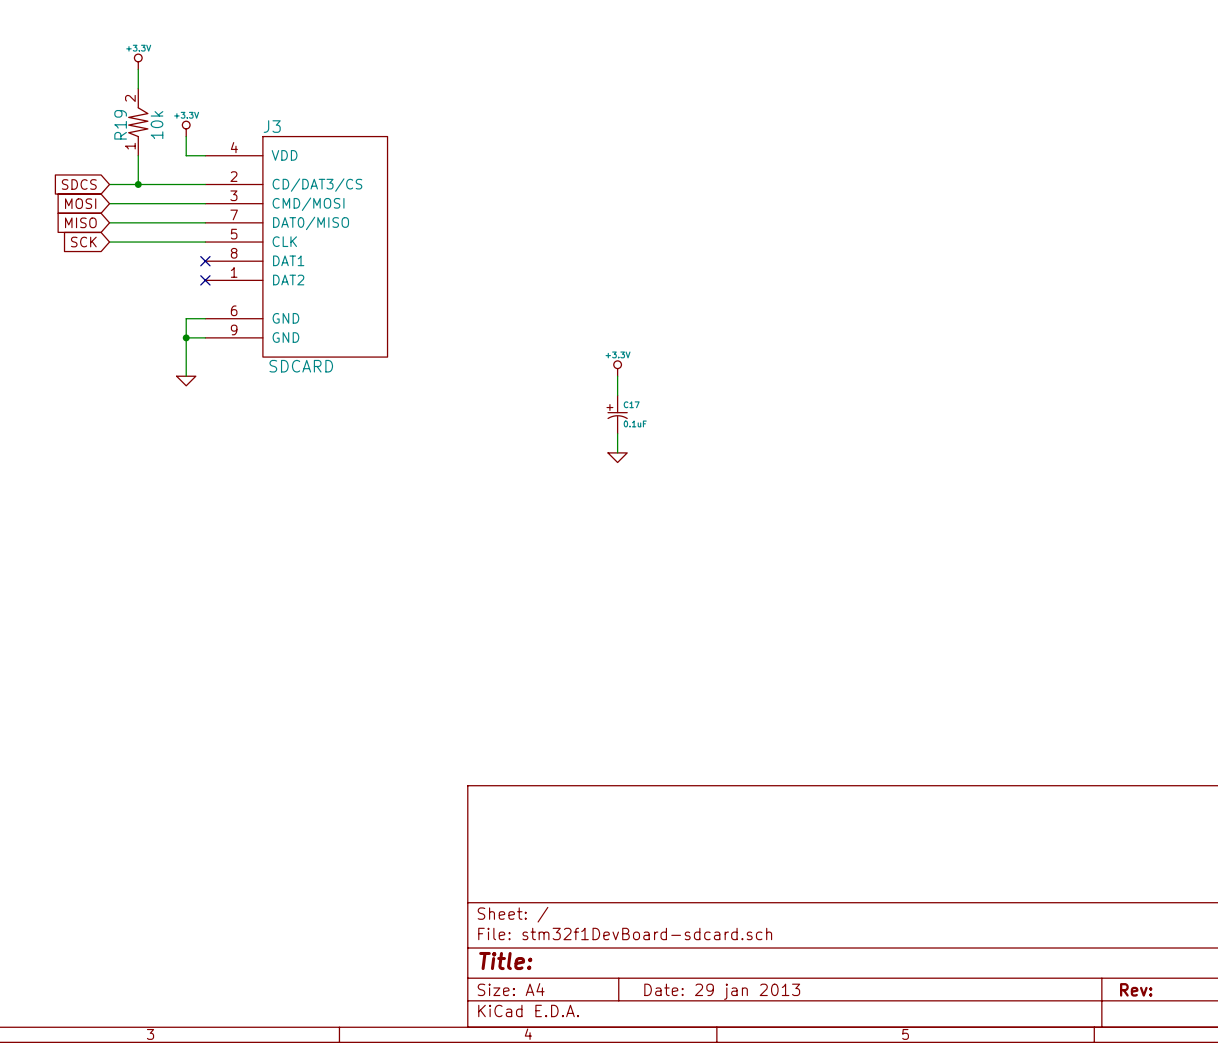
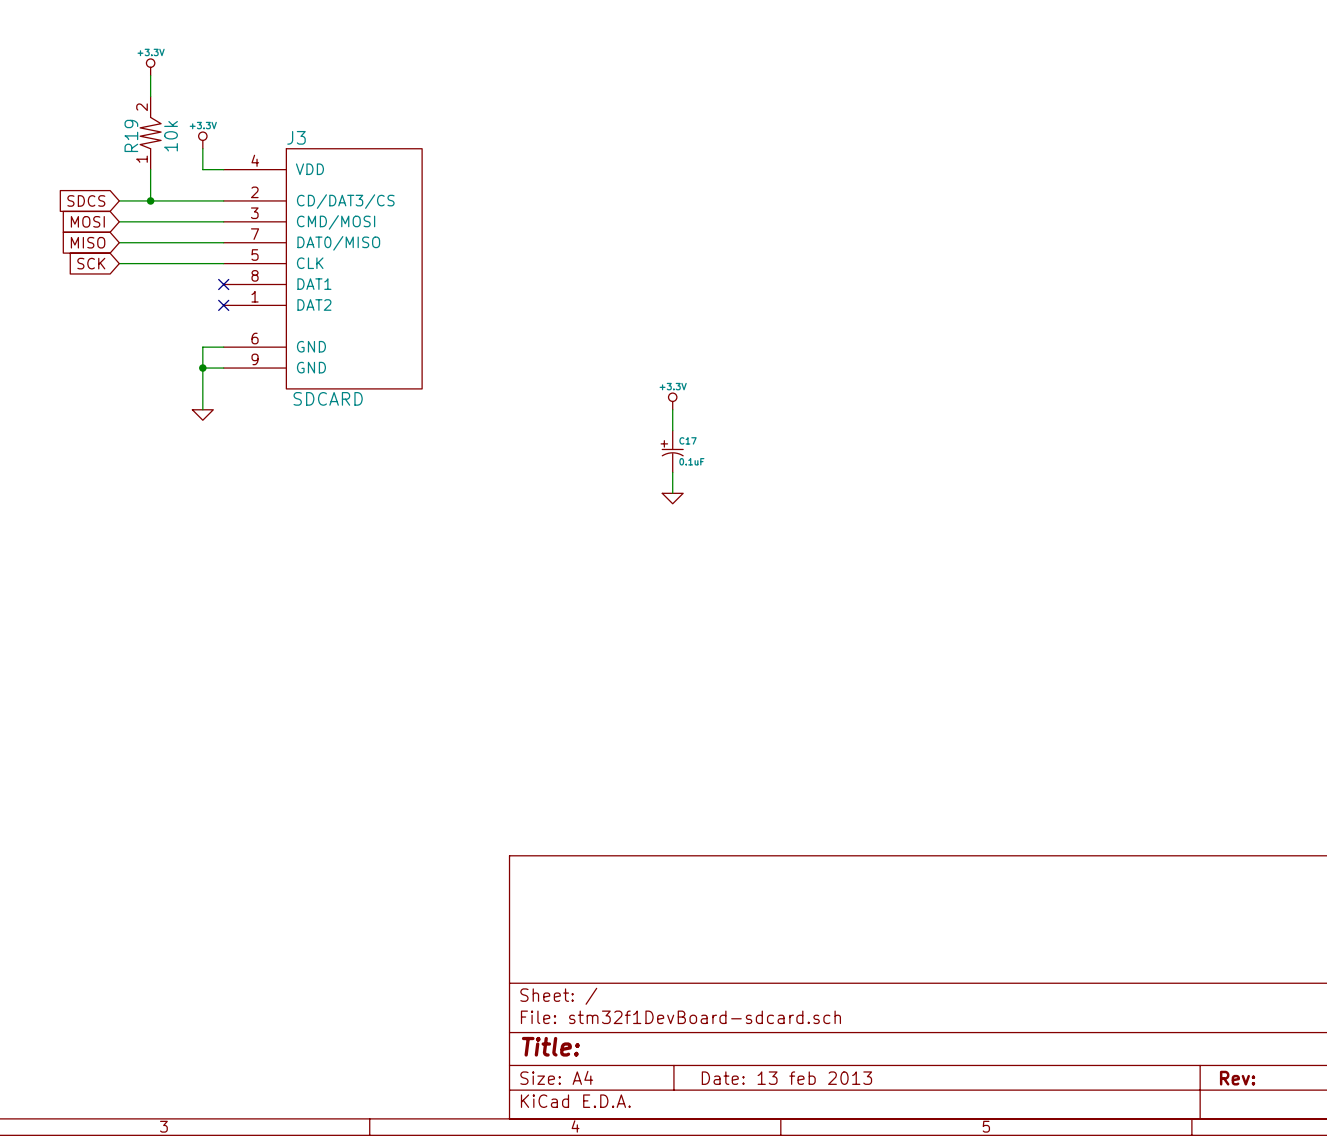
title block: Date: 29 jan 2013 (722, 991) -> Date: 13 feb 2013 (786, 1078)

